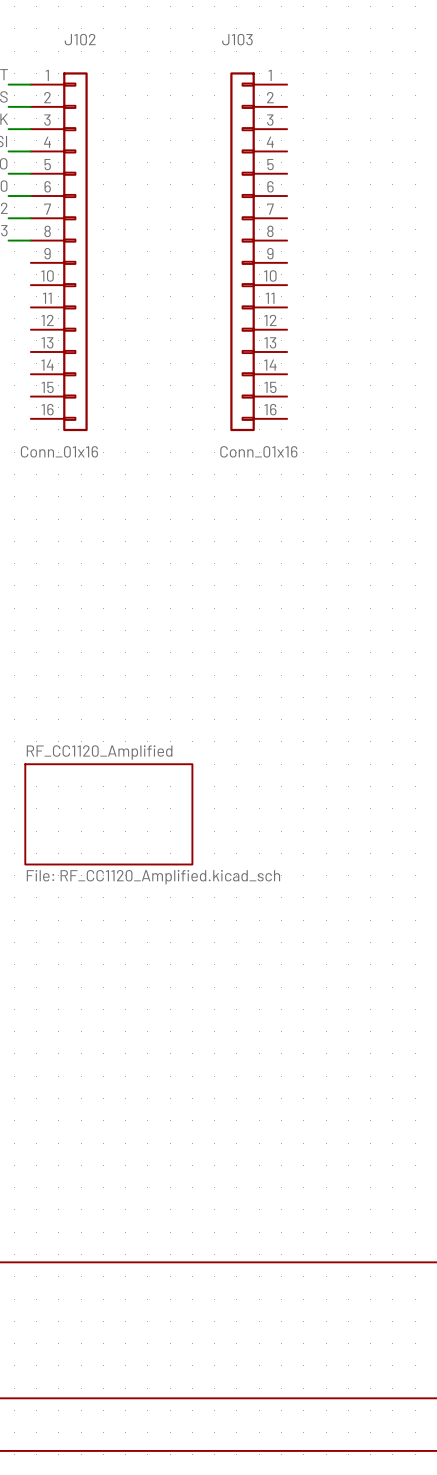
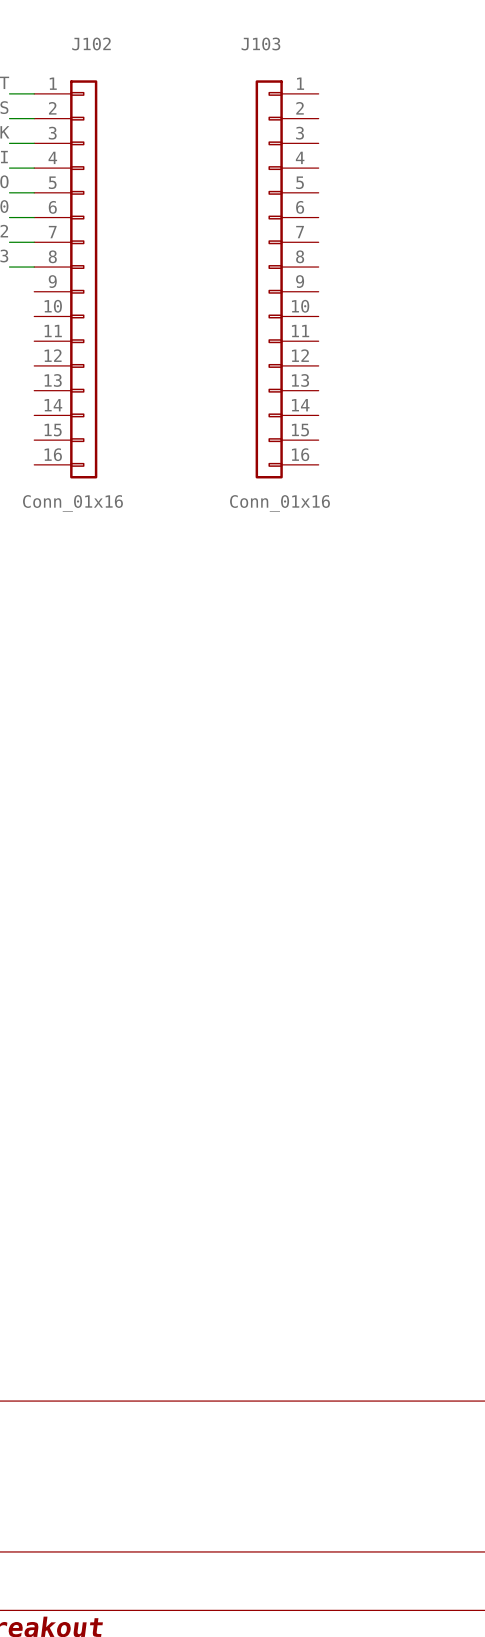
sheet RF_CC1120_Amplified: File: RF_CC1120_Amplified.kicad_sch (108, 814) -> none

